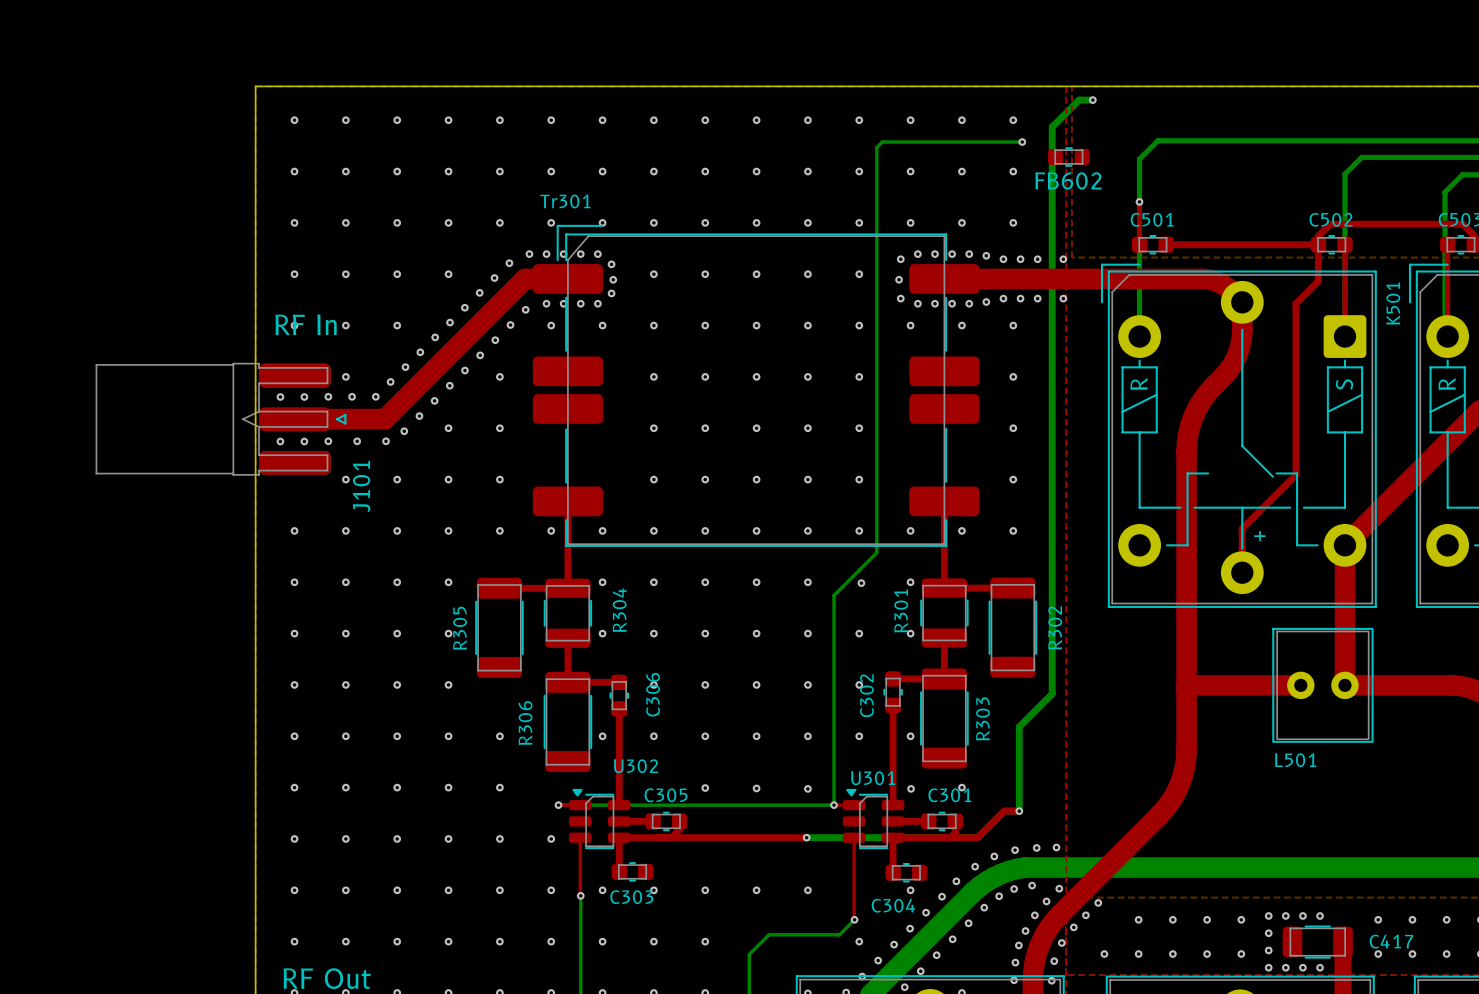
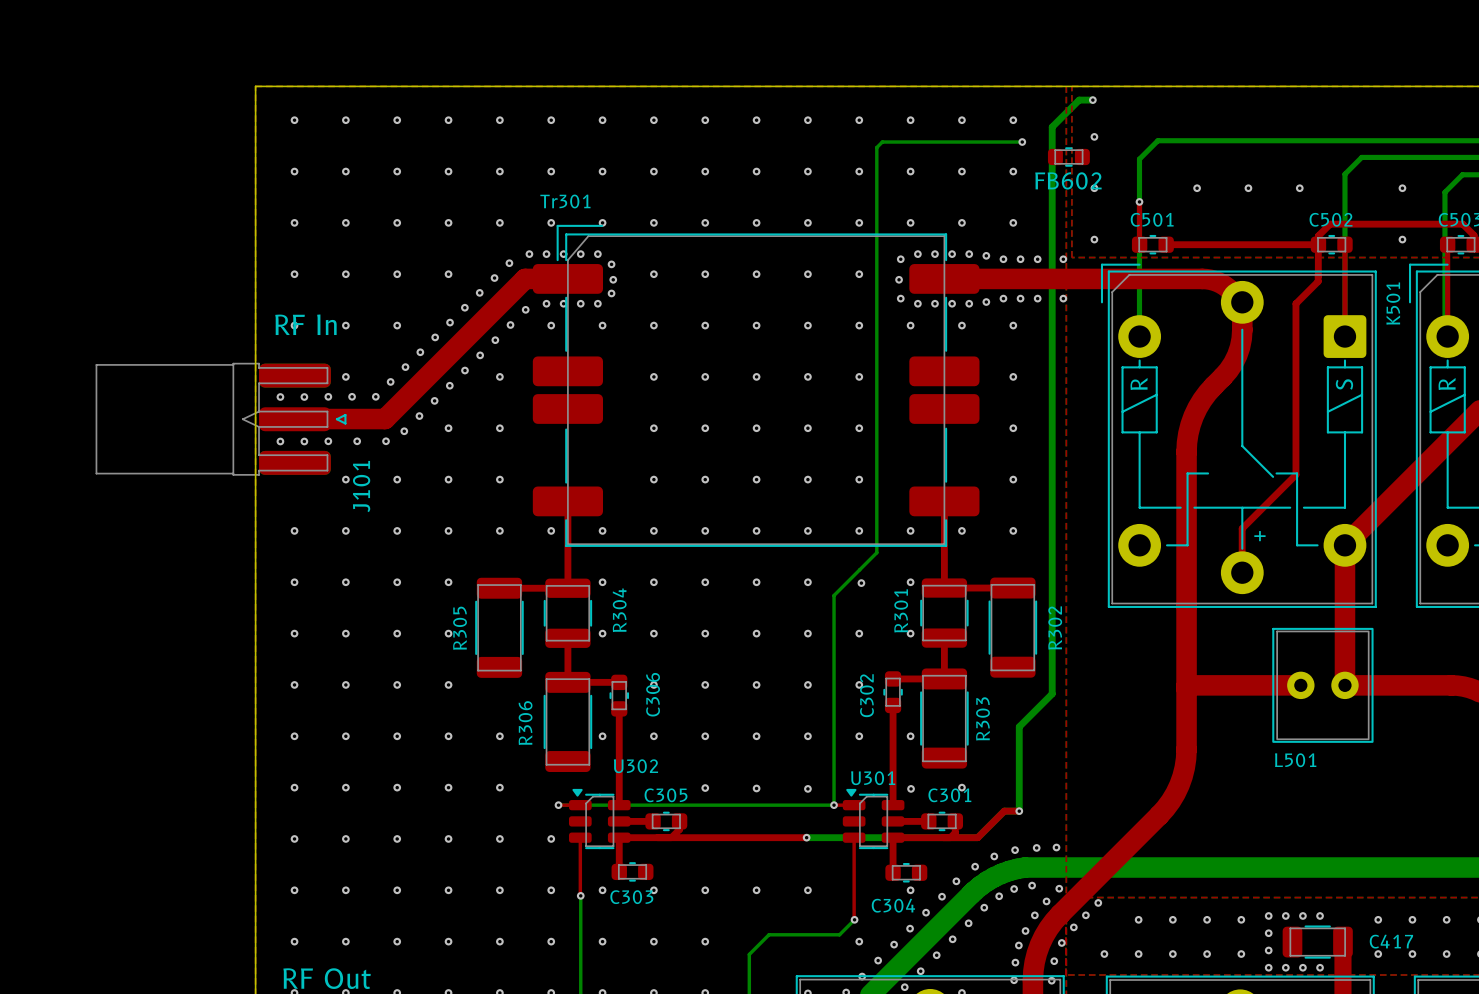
via: none -> (1094, 136)
via: none -> (1094, 188)
via: none -> (1197, 188)
via: none -> (1248, 188)
via: none -> (1299, 188)
via: none -> (1402, 188)
via: none -> (1094, 239)
via: none -> (1402, 239)

